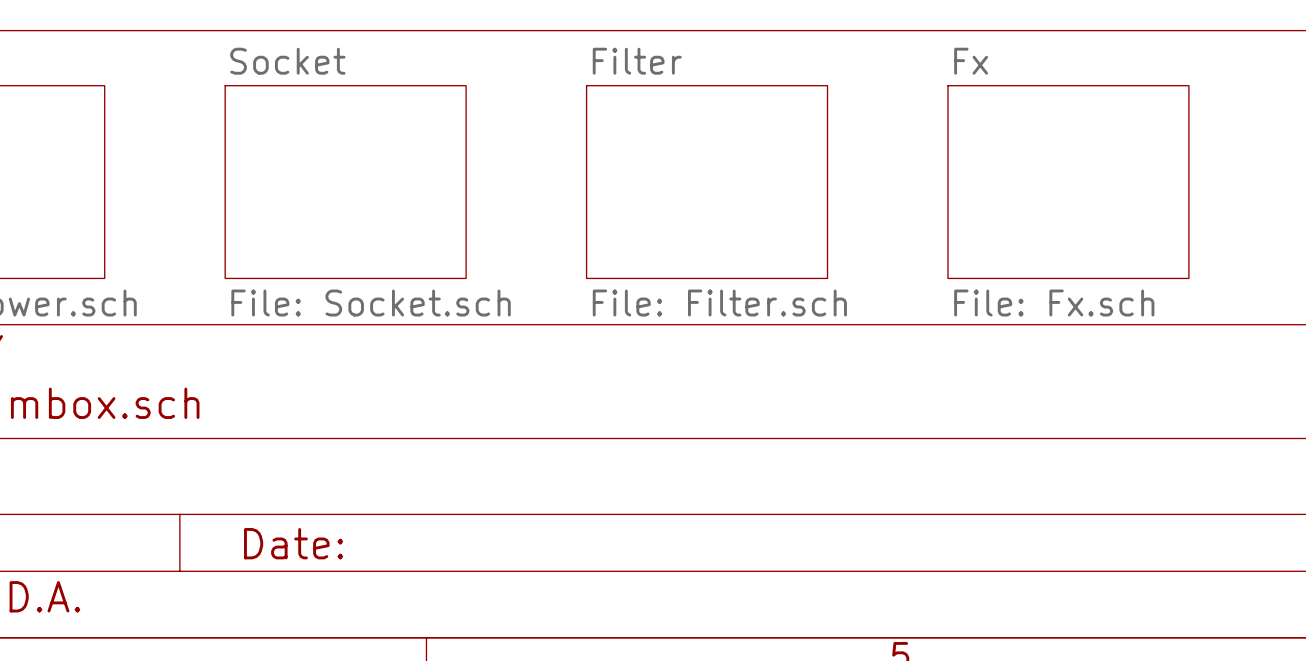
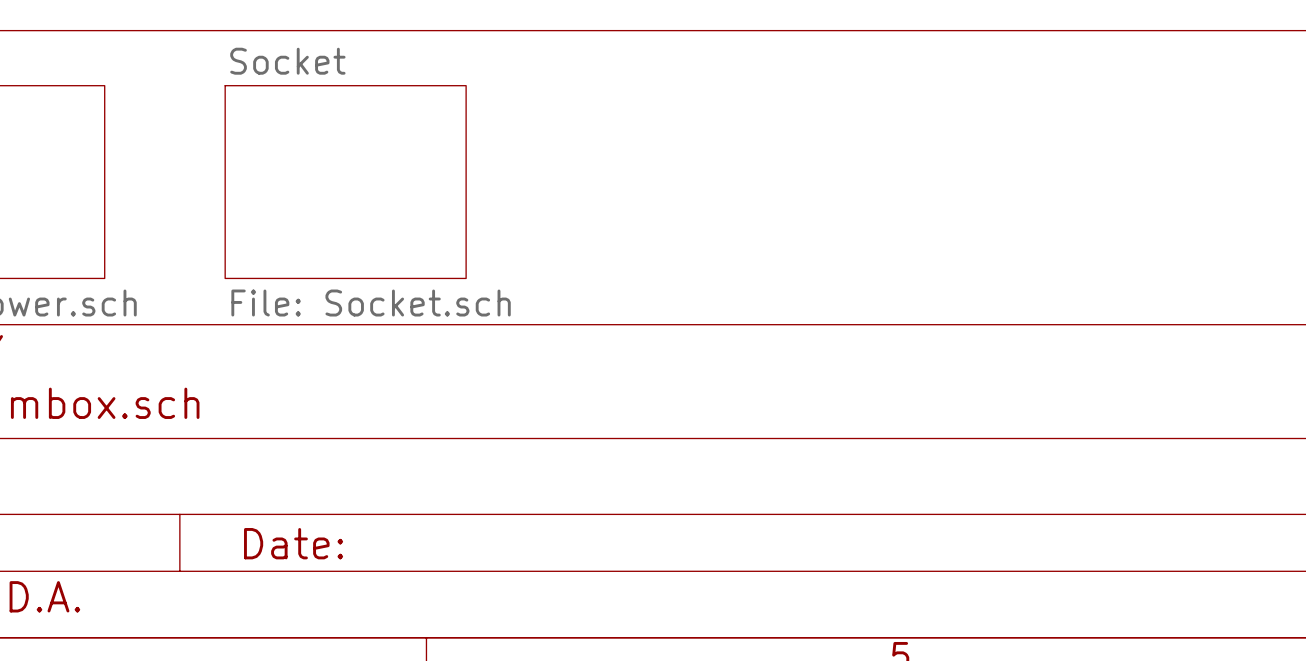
sheet Filter: File: Filter.sch (707, 182) -> none
sheet Fx: File: Fx.sch (1068, 182) -> none

